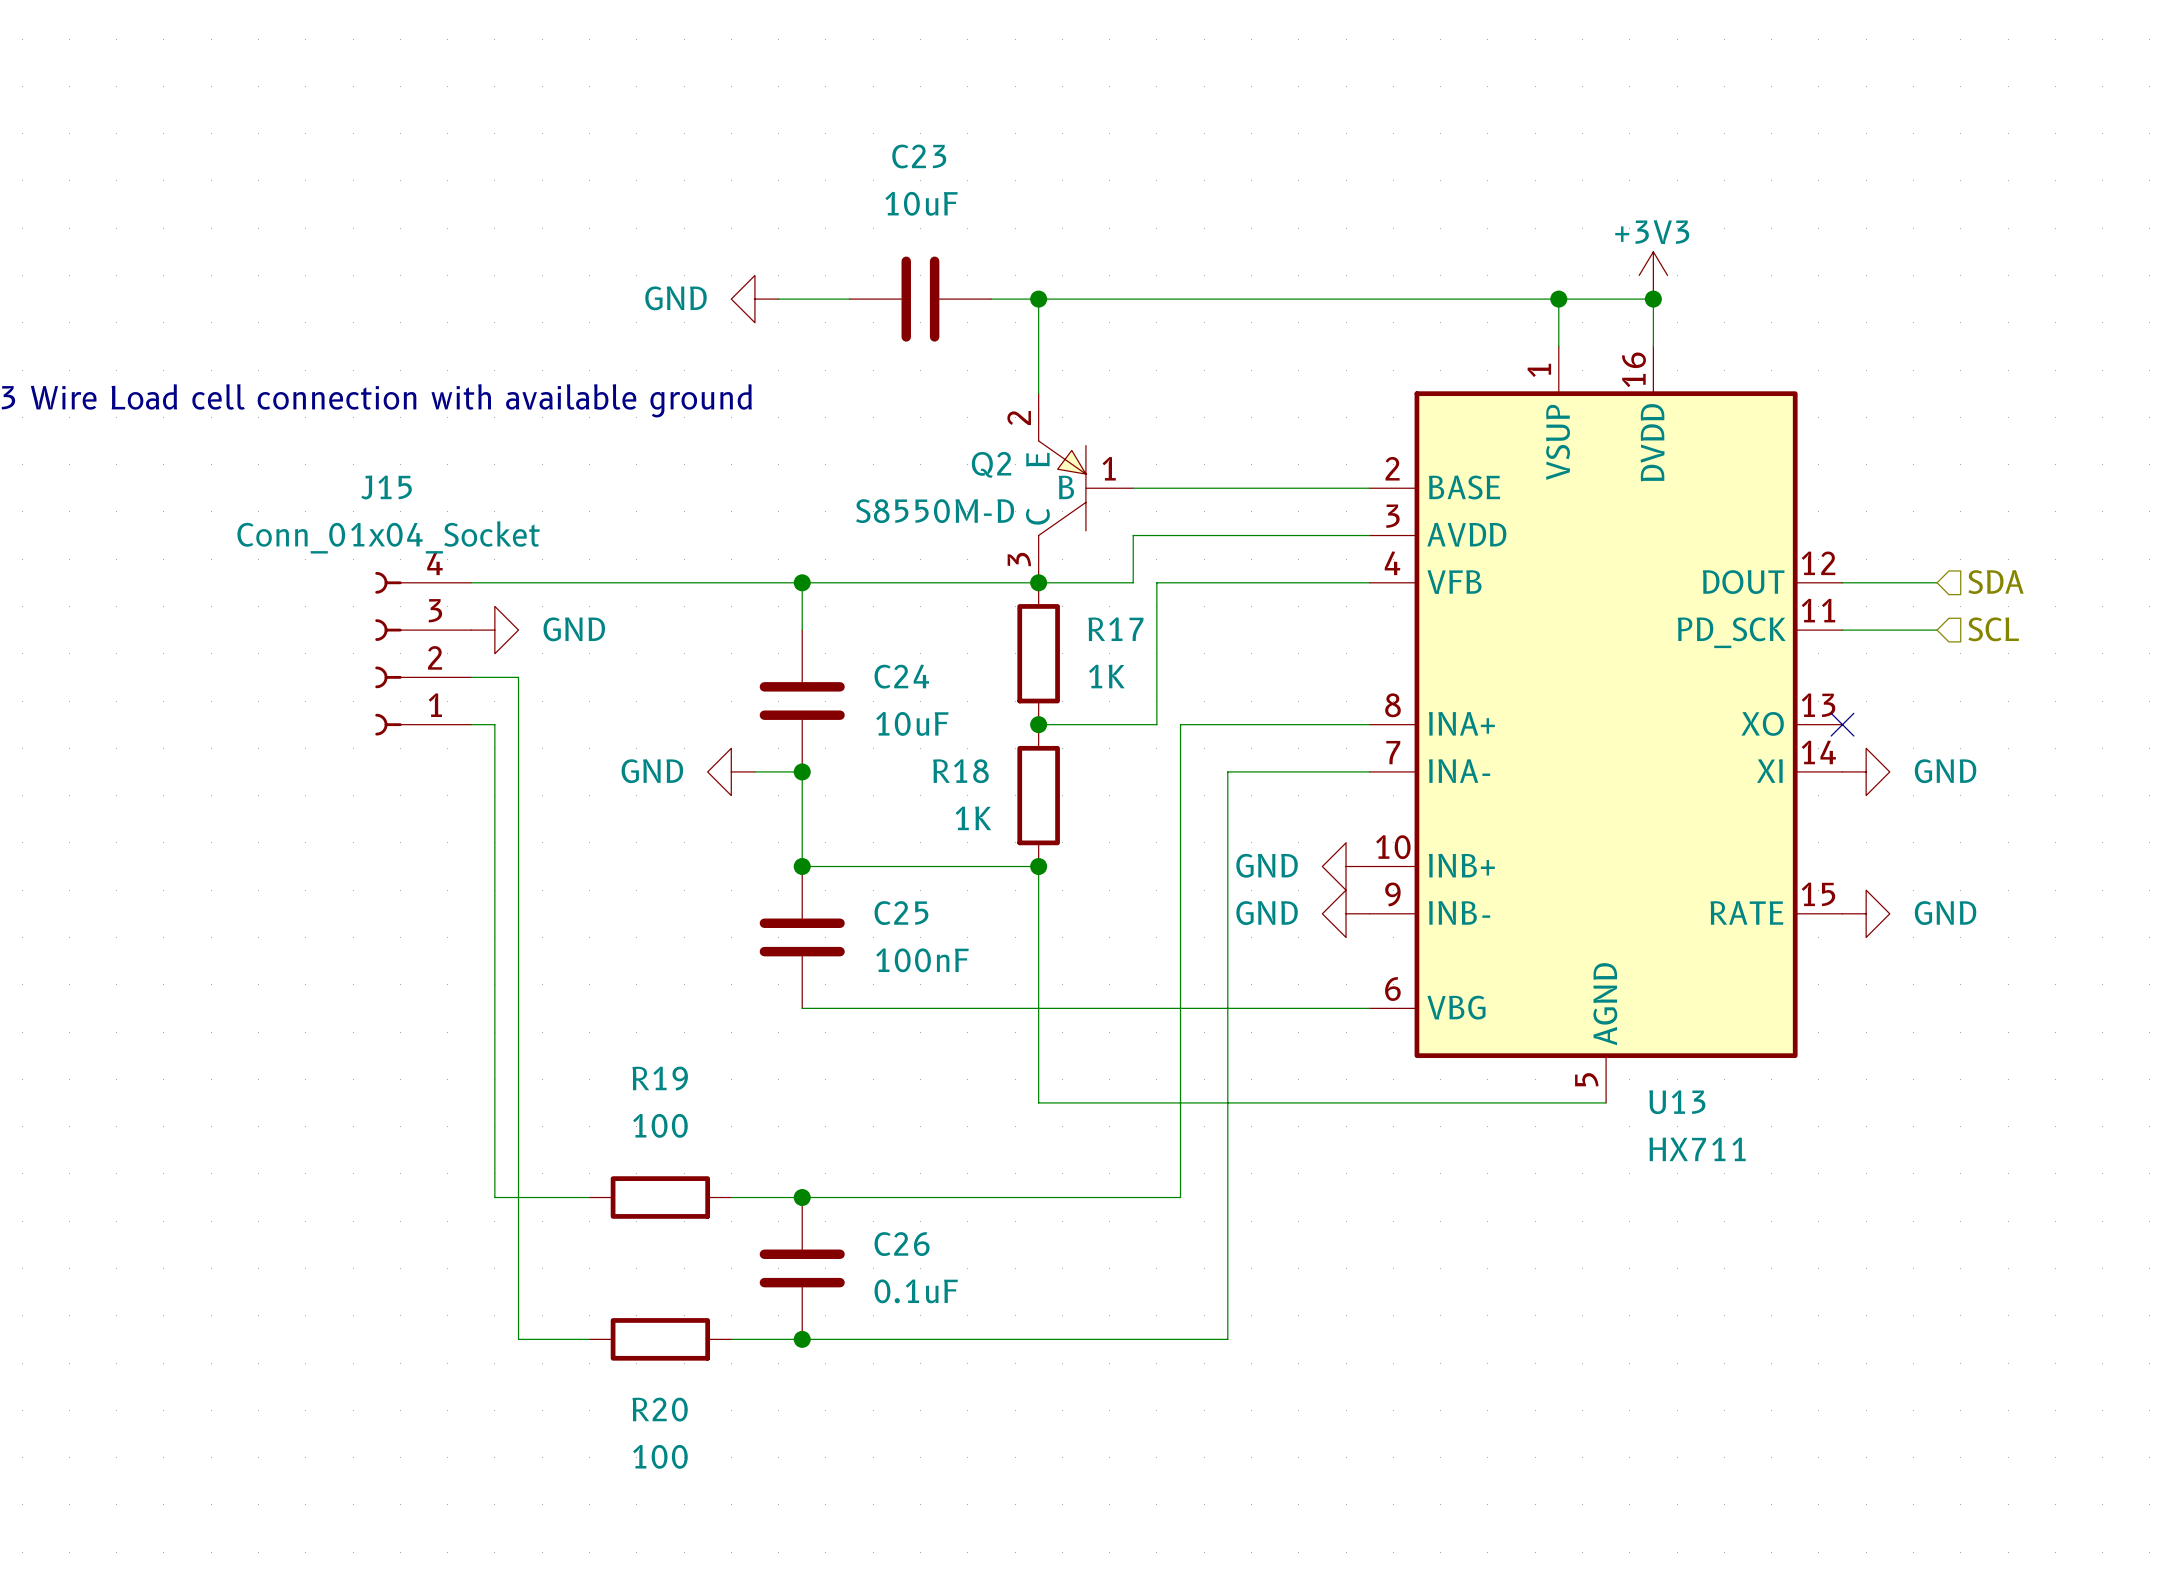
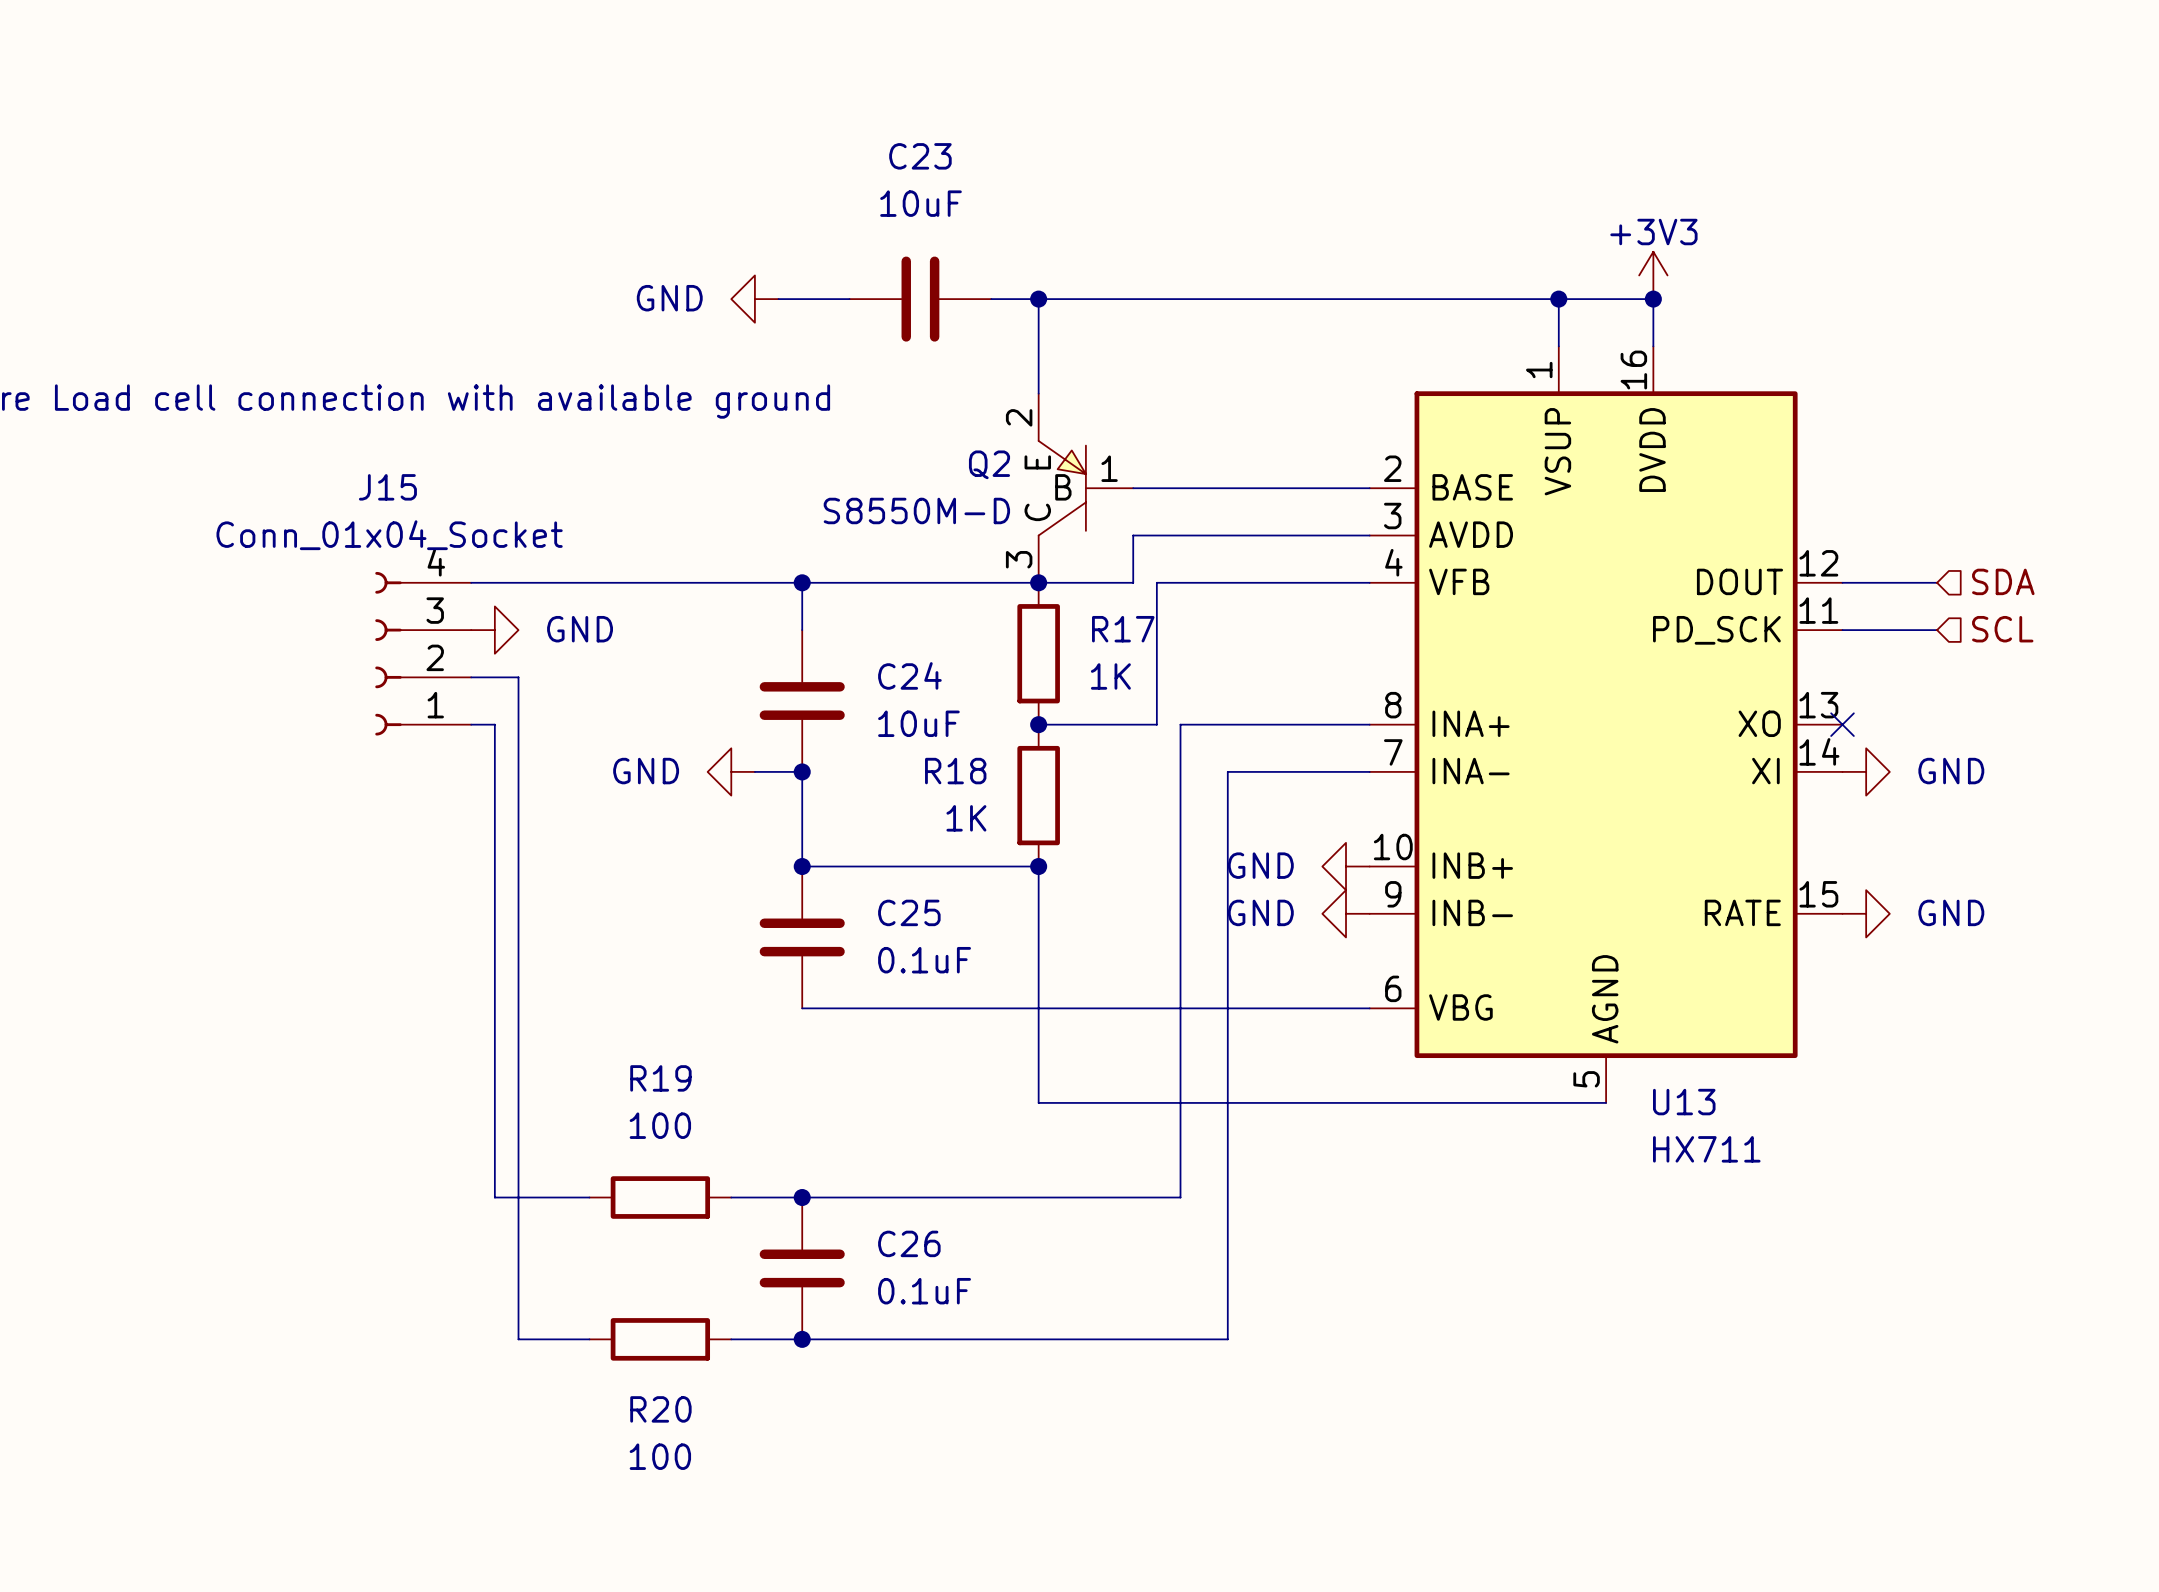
C25 value: 100nF (922, 960) -> 0.1uF (924, 960)

